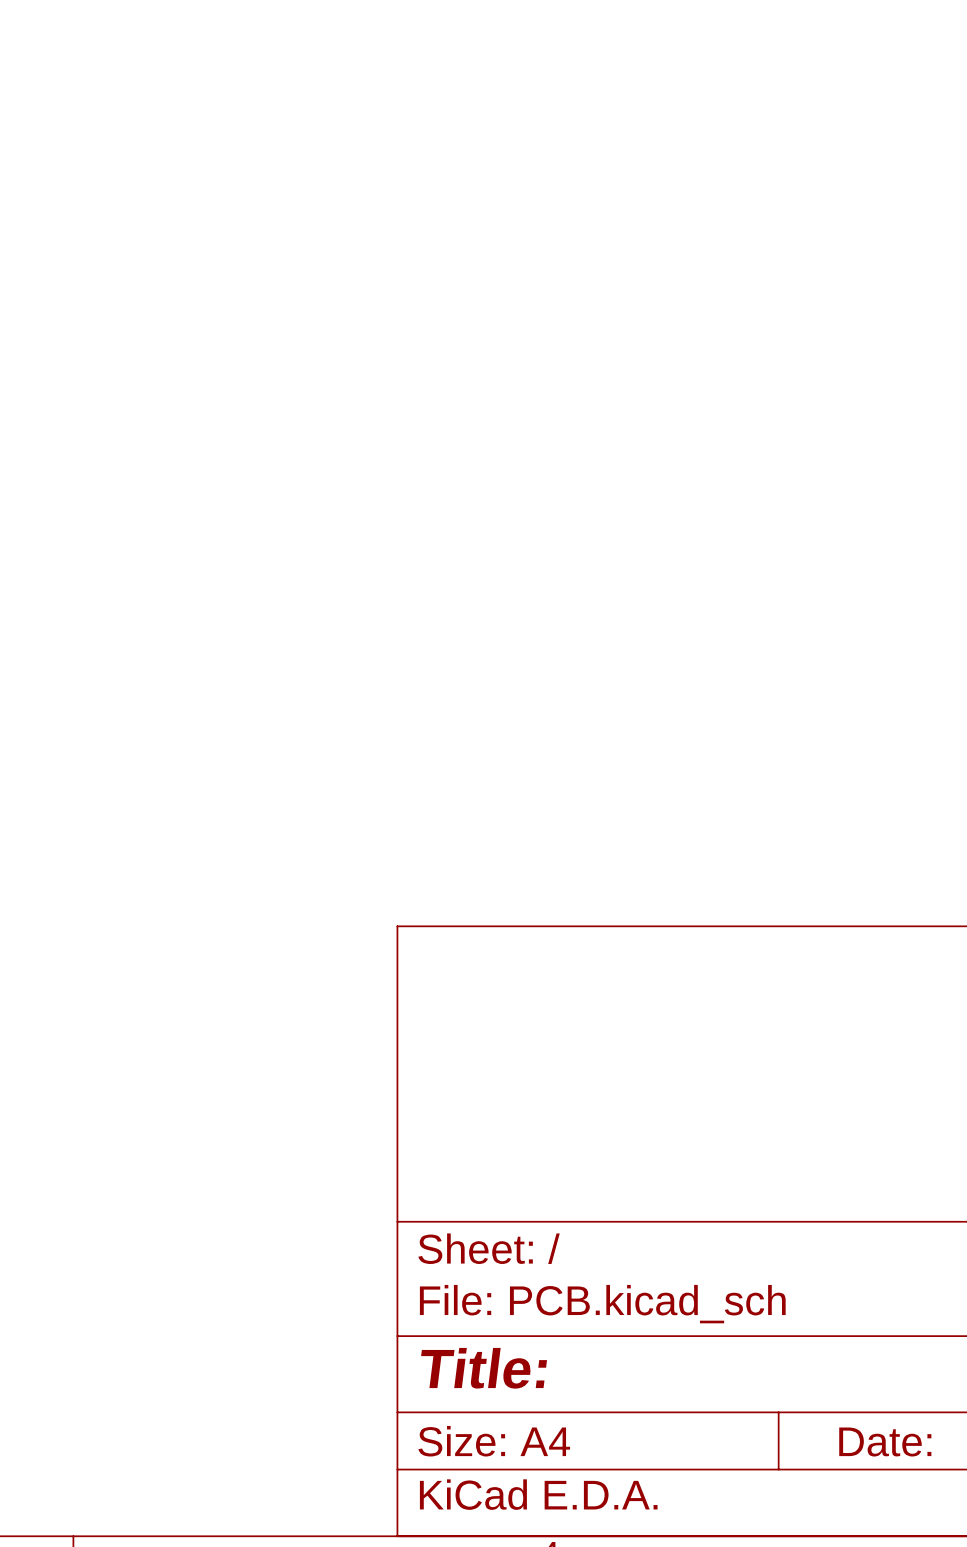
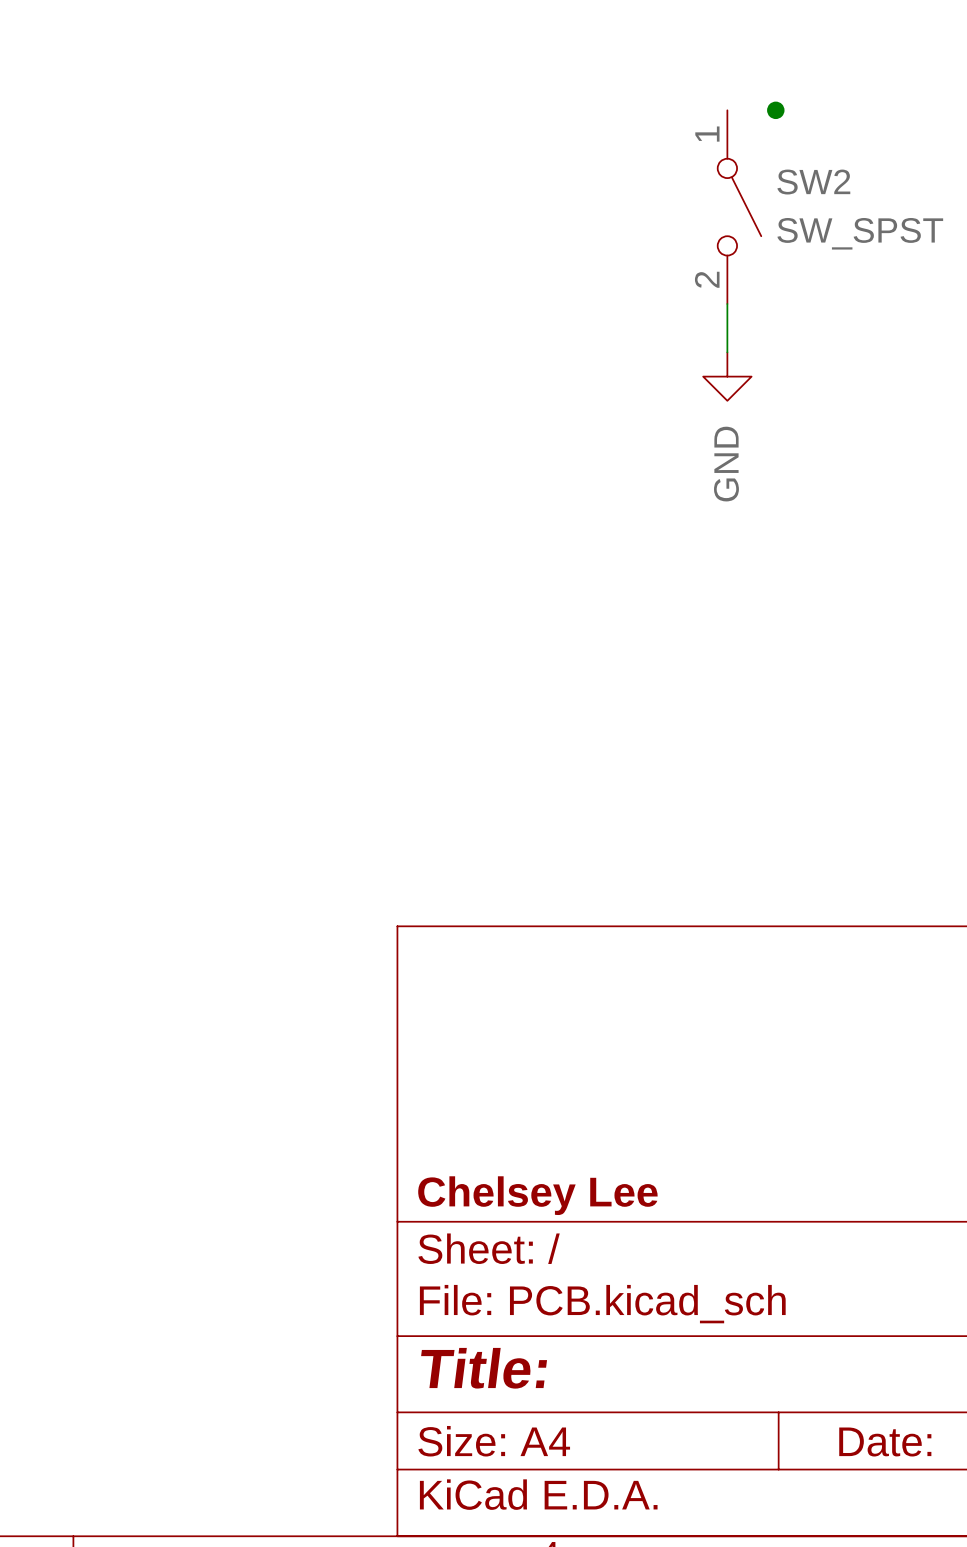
junction: none -> (775, 110)
SW2: none -> SW_SPST (739, 207)
wire: none -> (727, 303) (727, 352)
power symbol: none -> GND (727, 376)
title block: none -> Chelsey Lee (537, 1195)

